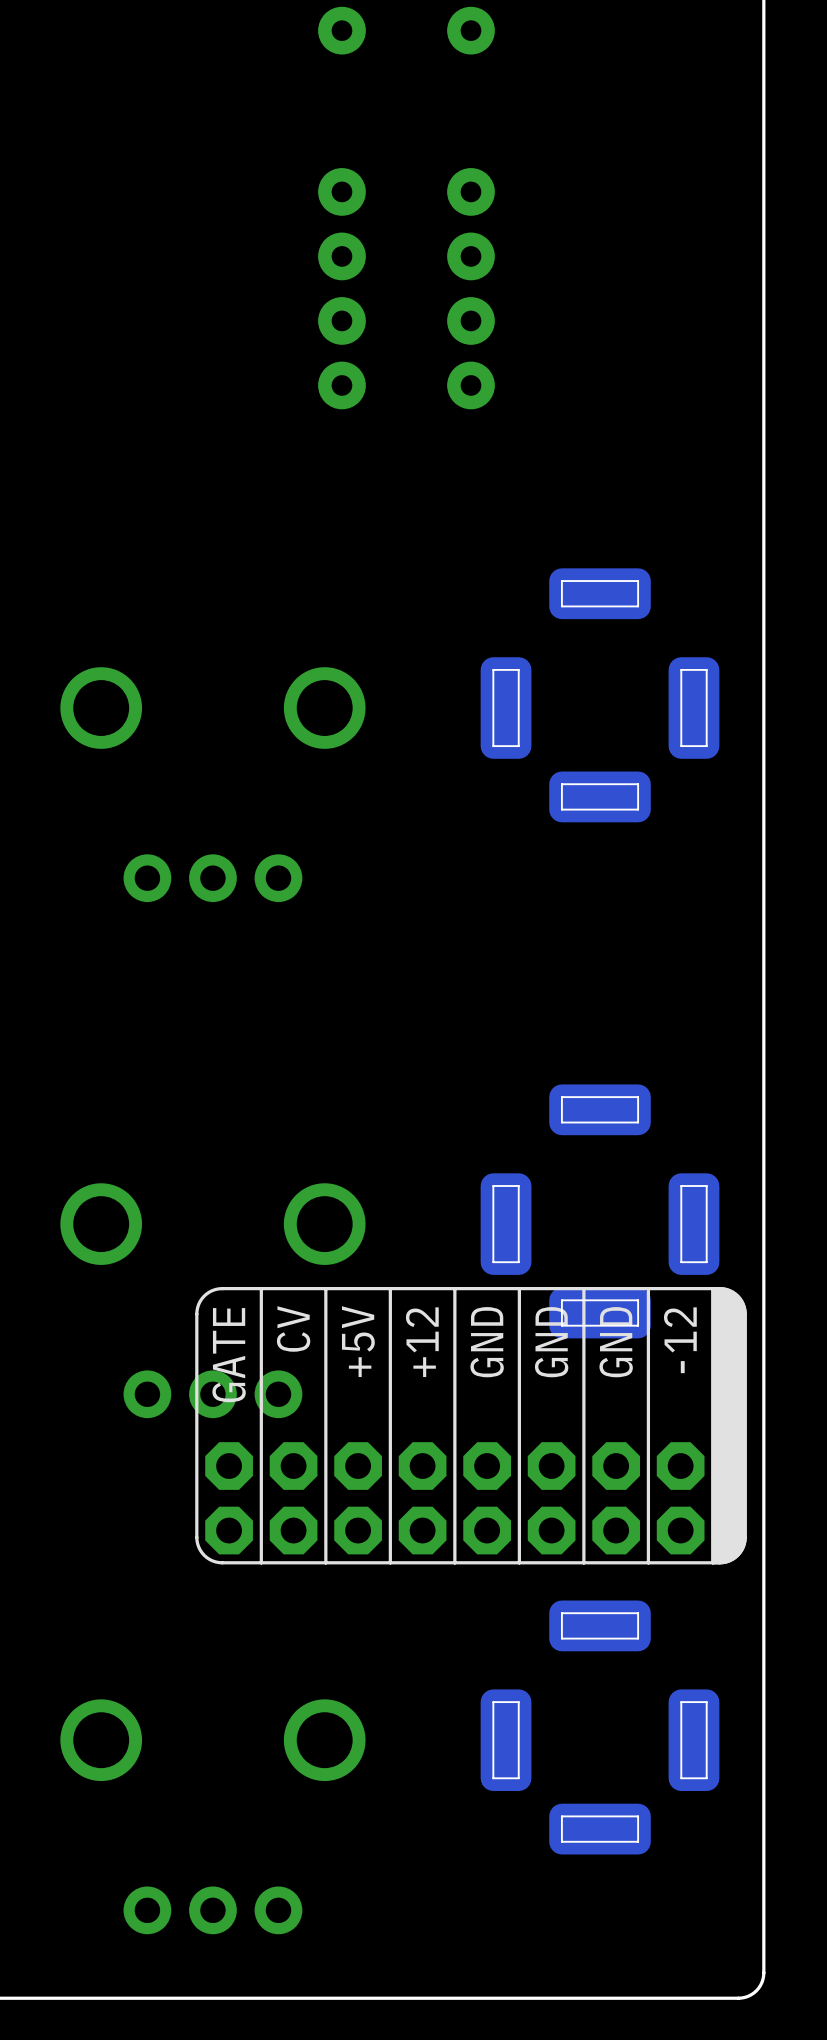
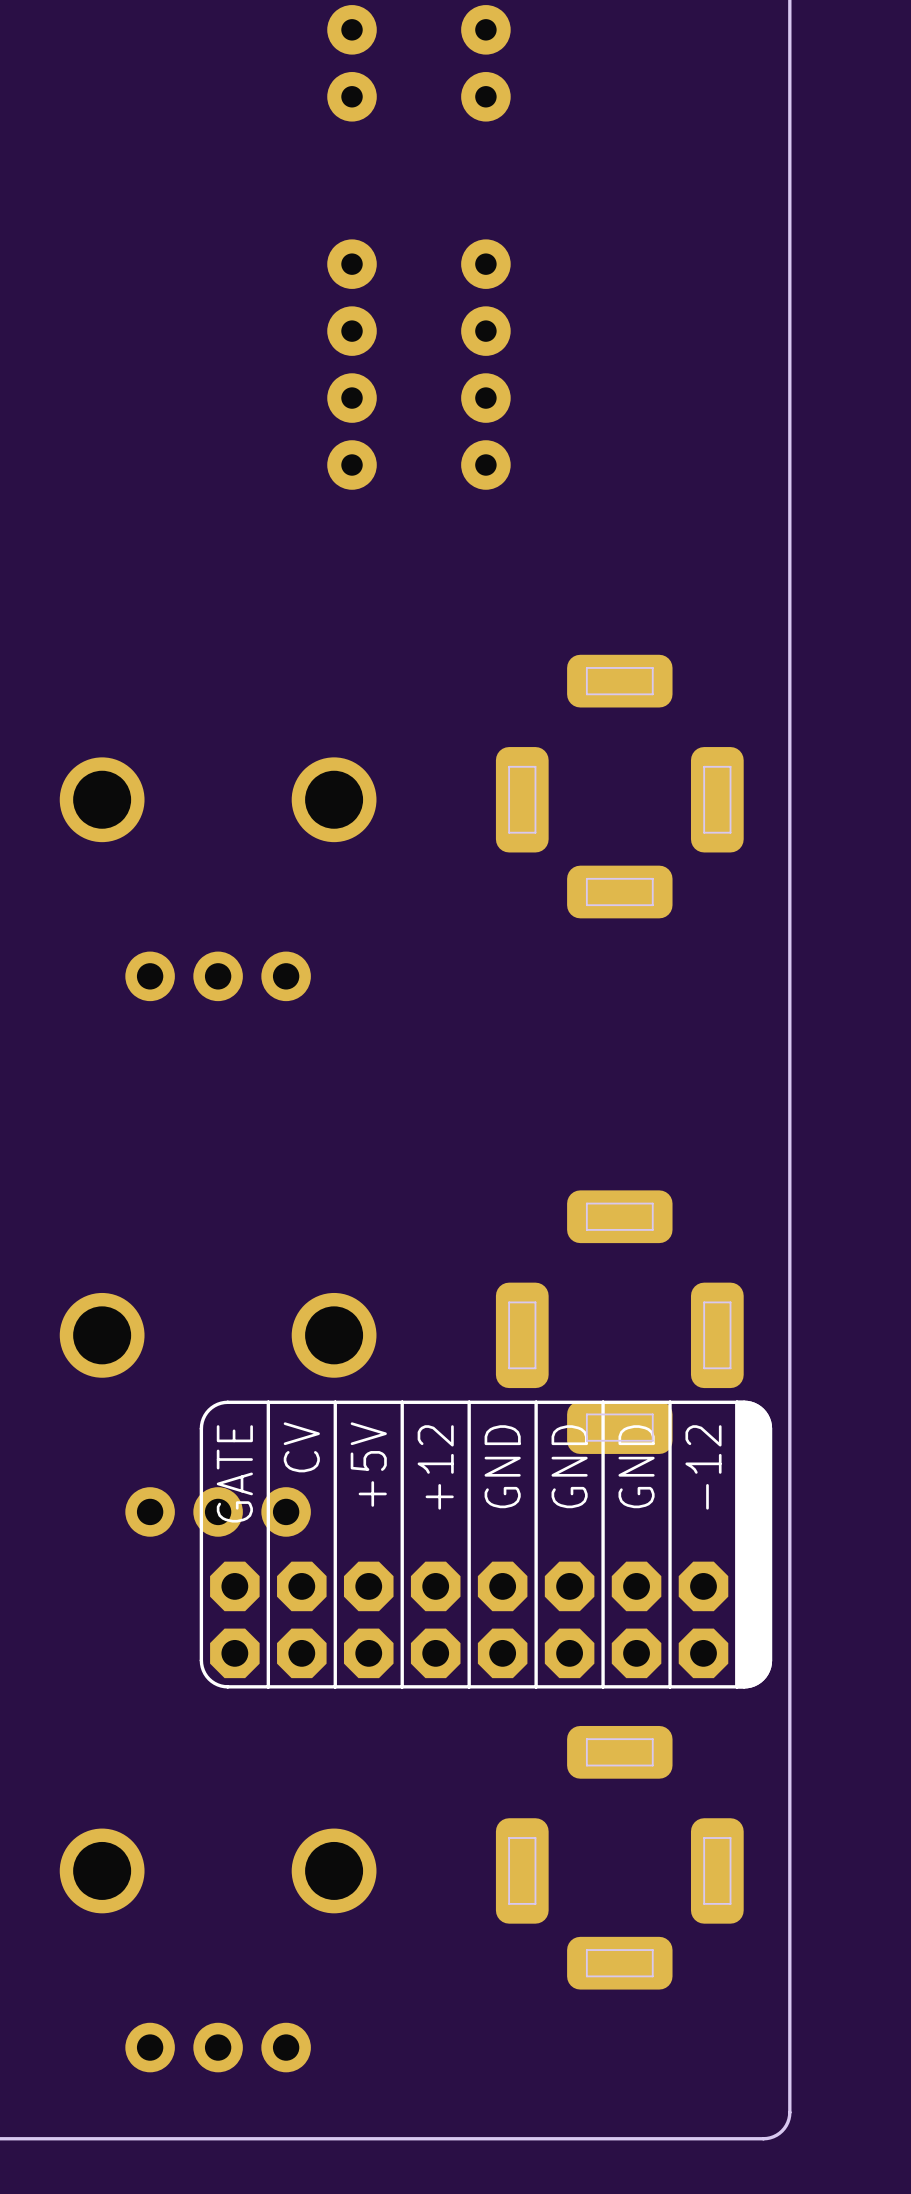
part footprint: [480, 568, 720, 823] -> [495, 654, 744, 919]
part footprint: [480, 1084, 720, 1339] -> [495, 1190, 744, 1454]
part footprint: [480, 1600, 720, 1855] -> [495, 1725, 744, 1990]

